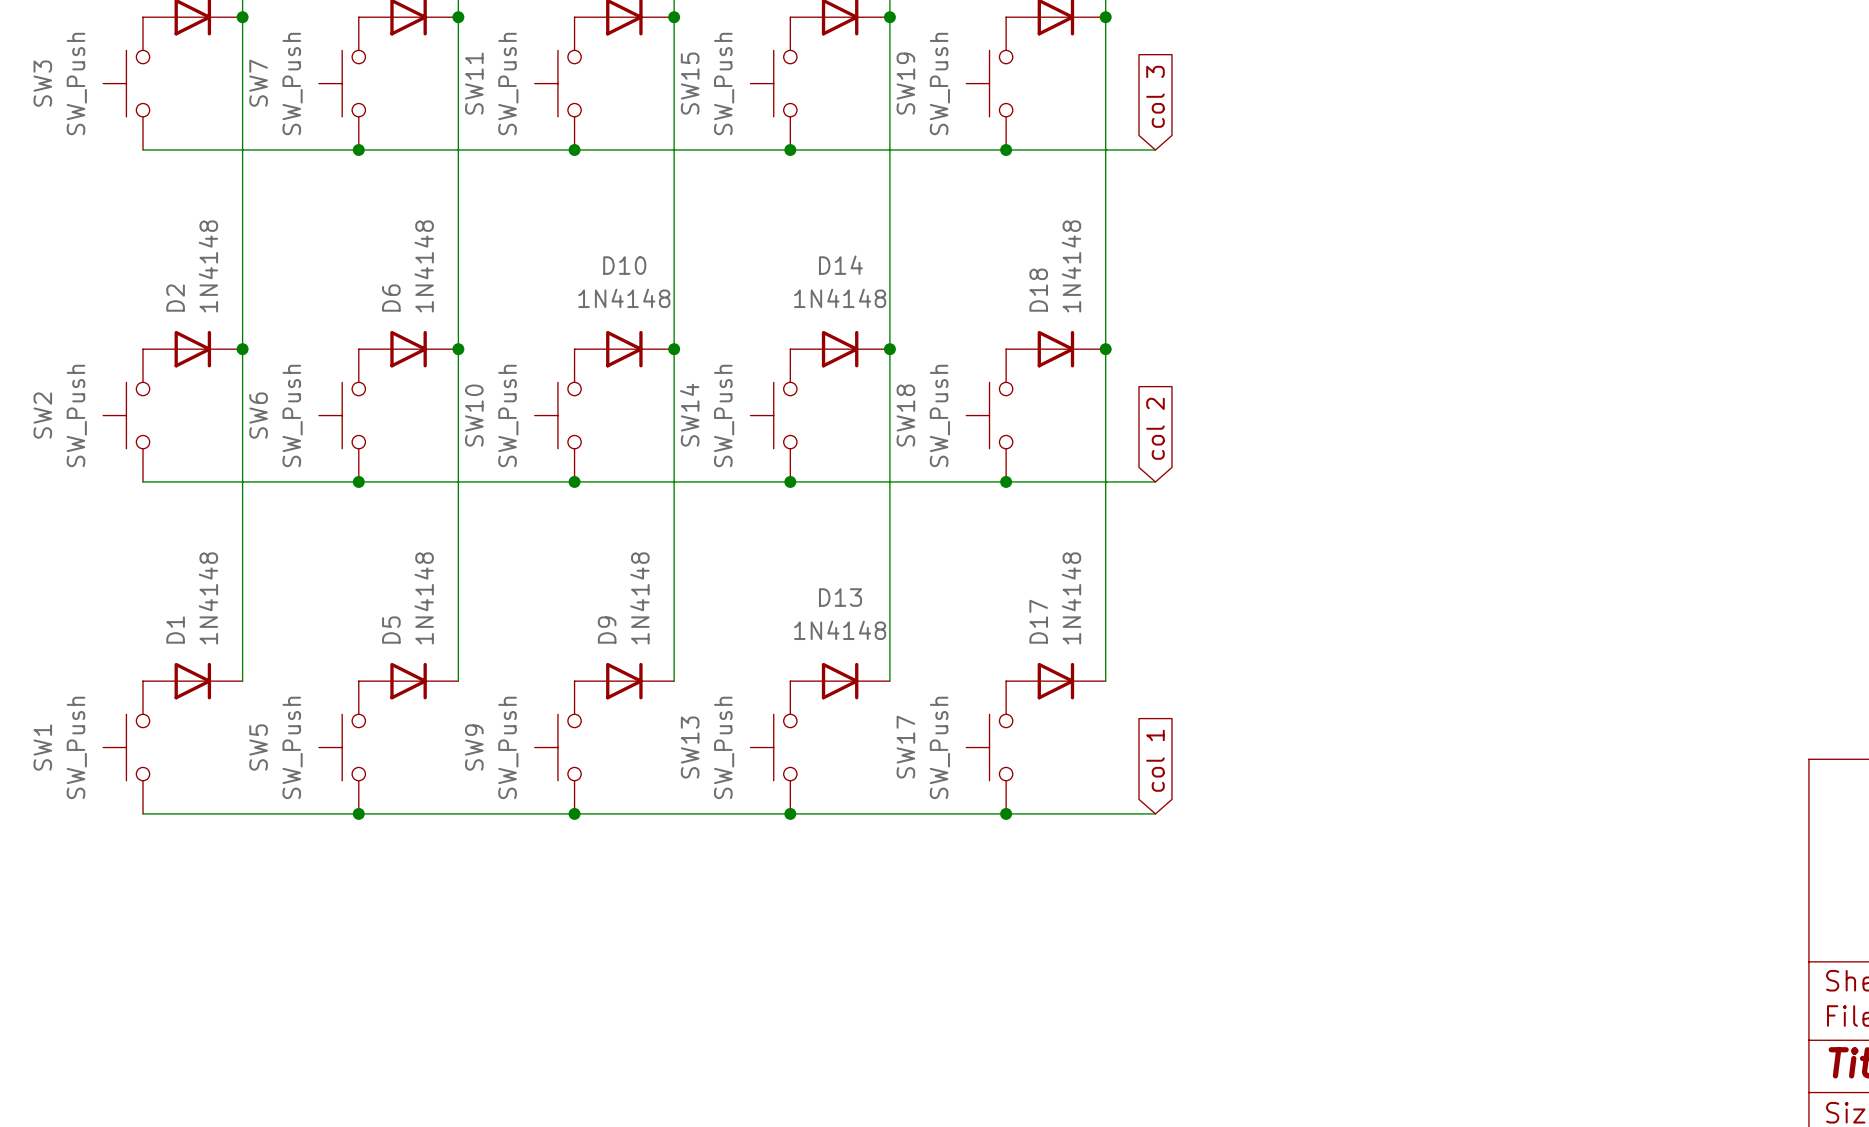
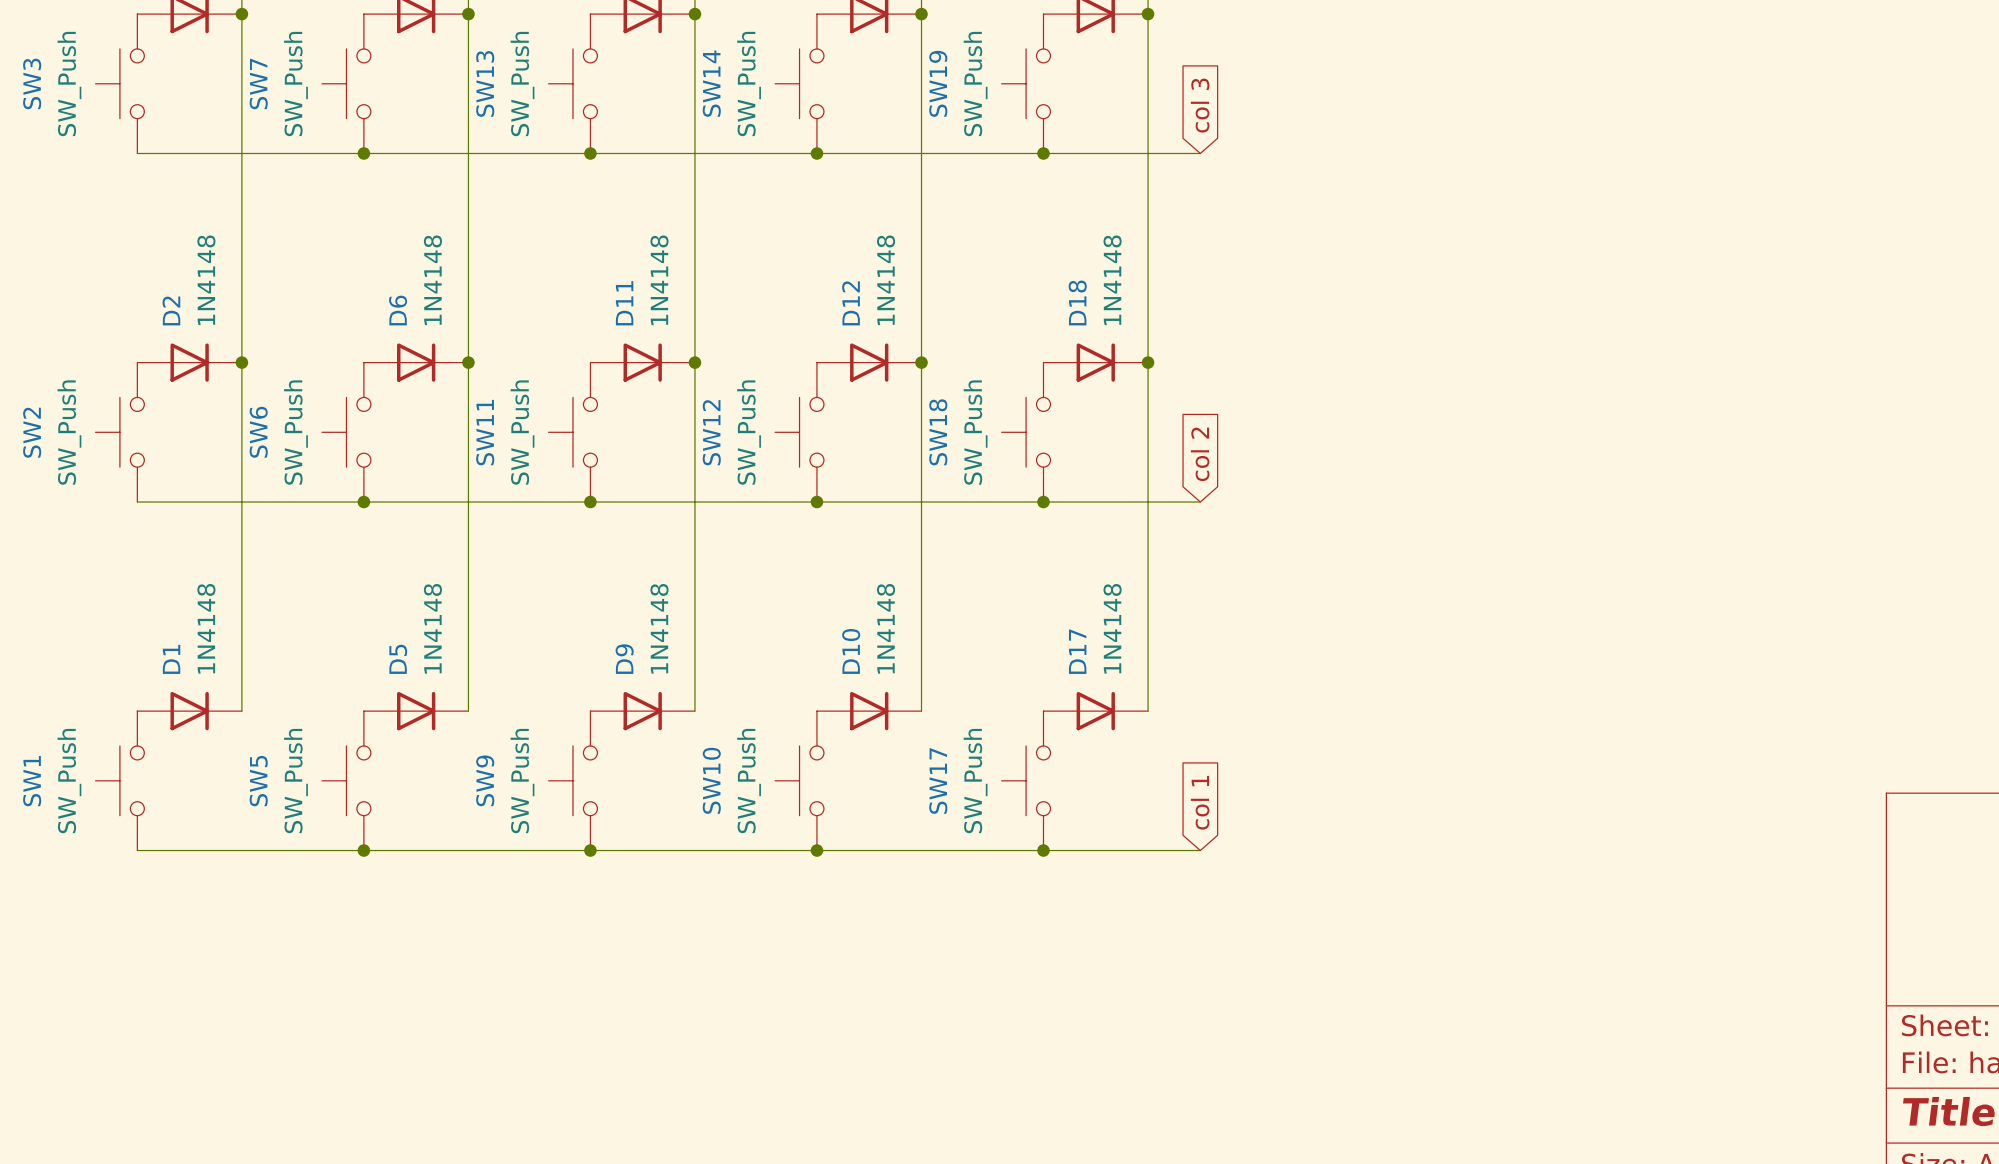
SW11 name: SW11 (474, 83) -> SW13 (485, 83)
SW15 name: SW15 (690, 83) -> SW14 (711, 83)
D10 name: D10 (624, 265) -> D11 (624, 303)
D14 name: D14 (840, 265) -> D12 (851, 303)
D10 value rotation: 0° (624, 298) -> 90° counterclockwise (659, 280)
D14 value rotation: 0° (840, 298) -> 90° counterclockwise (886, 280)
SW10 name: SW10 (474, 415) -> SW11 (485, 432)
SW14 name: SW14 (689, 415) -> SW12 (711, 432)
D13 name: D13 (840, 597) -> D10 (851, 651)
D13 value rotation: 0° (840, 630) -> 90° counterclockwise (886, 628)
SW13 name: SW13 (690, 747) -> SW10 (711, 780)

